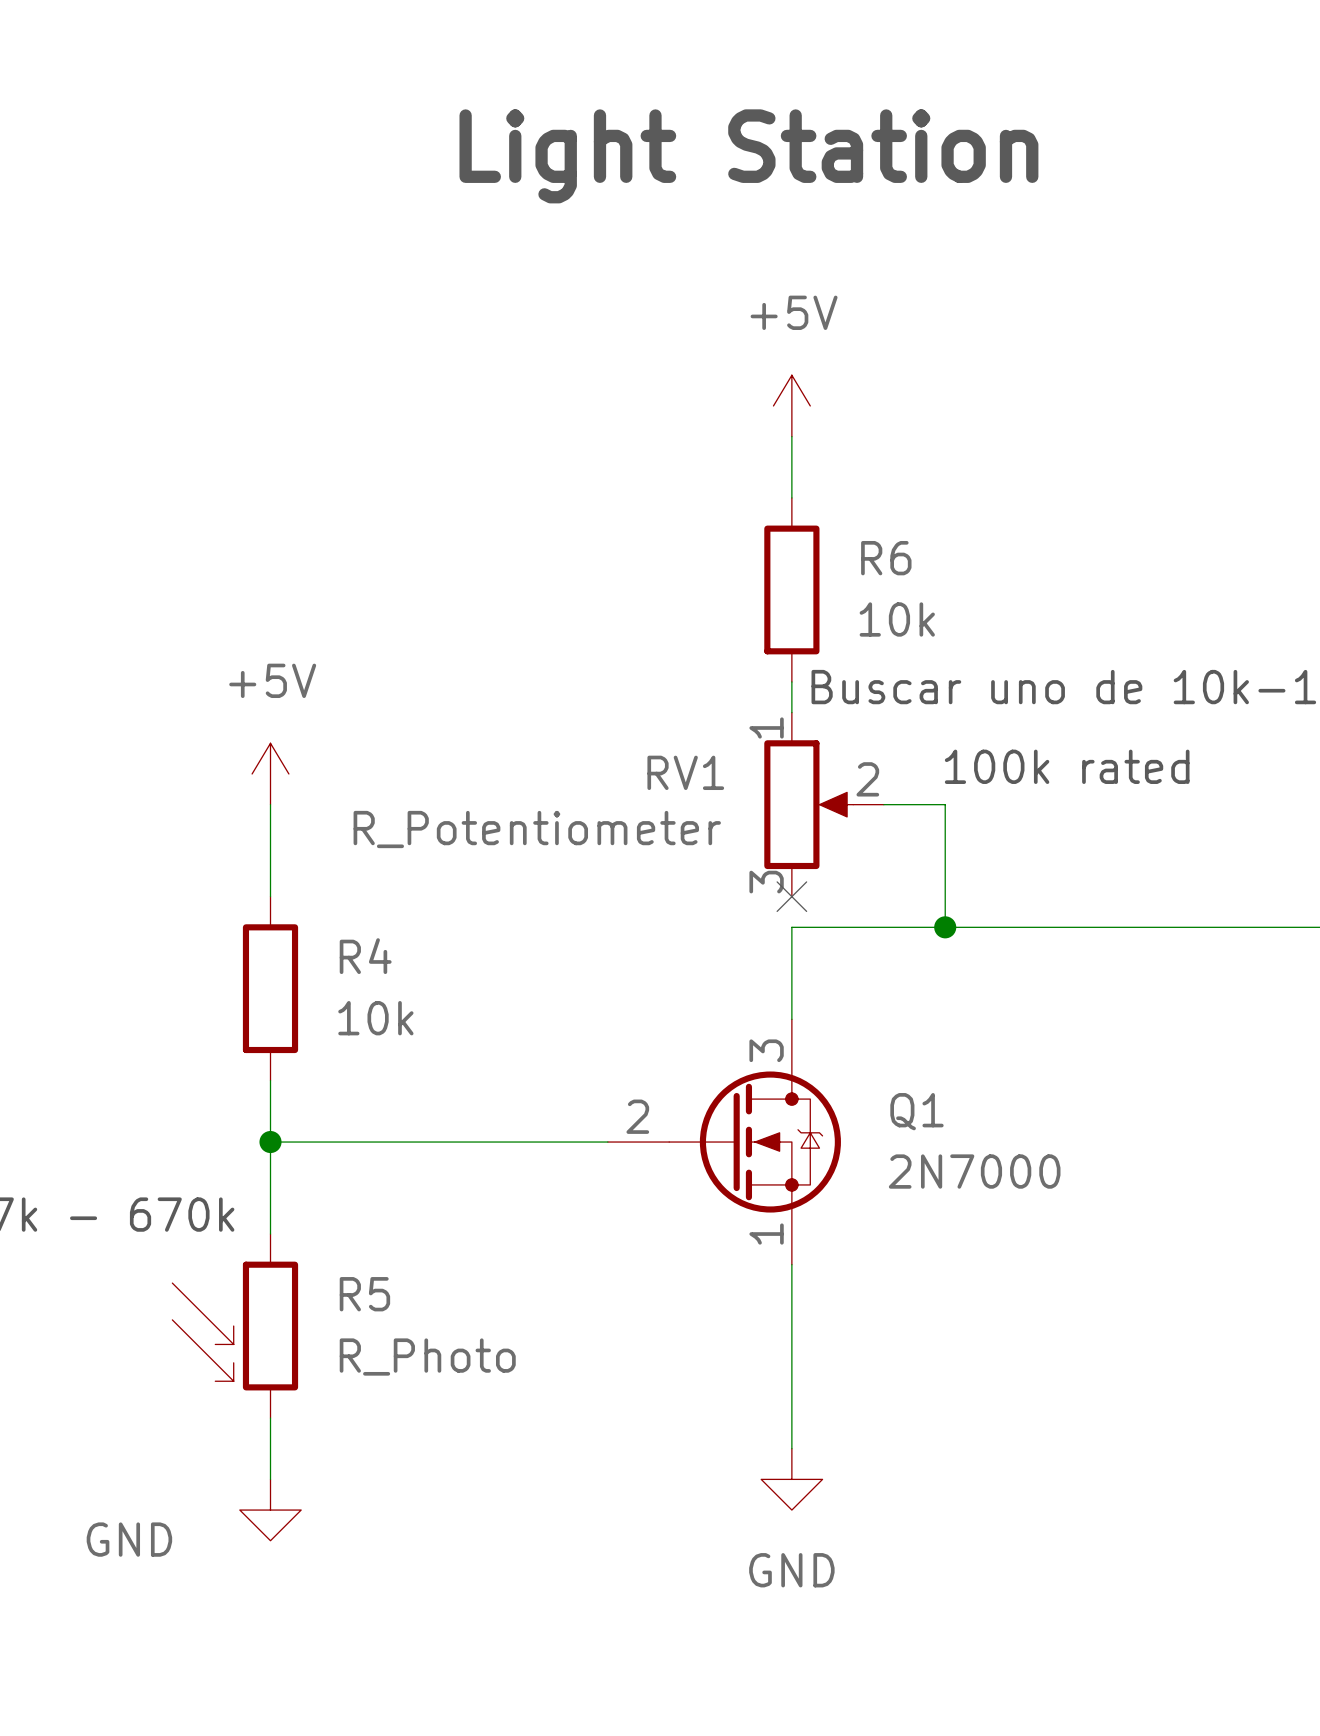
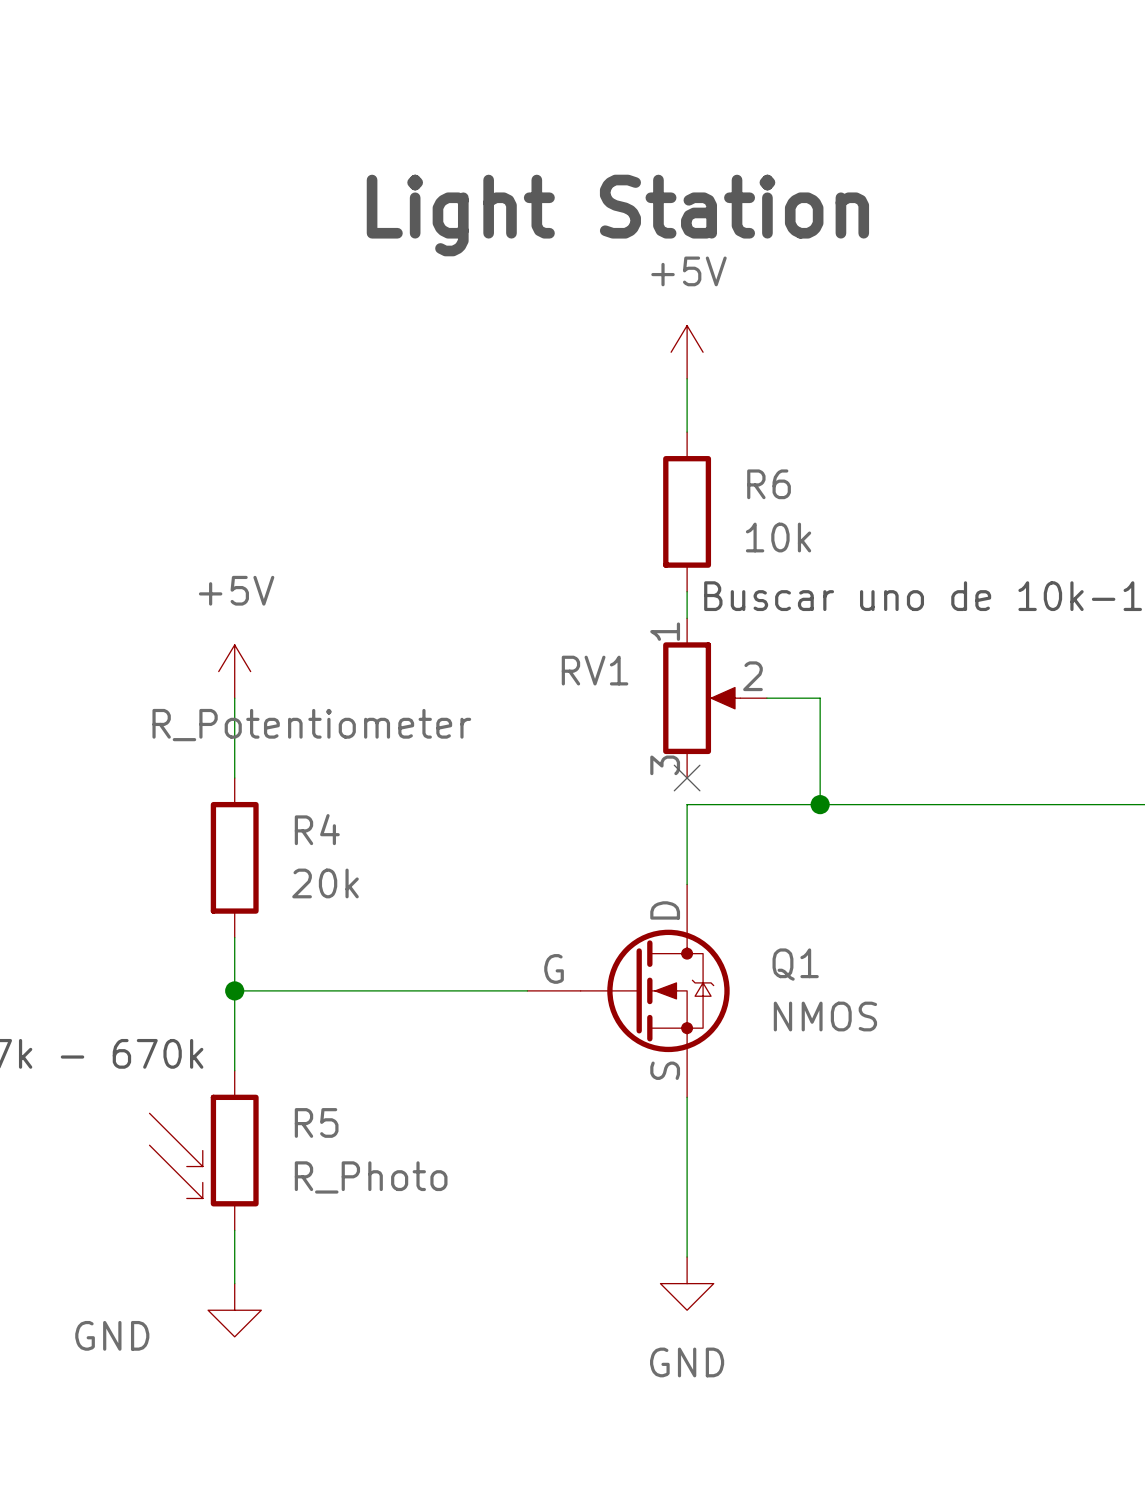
text position: Light Station (748, 156) -> Light Station (617, 215)
text: 100k rated (1067, 766) -> none
RV1 value position: R_Potentiometer (537, 829) -> R_Potentiometer (311, 725)
R4 value: 10k (375, 1018) -> 20k (325, 883)
Q1 pin name: none -> D (665, 910)
Q1 pin number: 3 (766, 1050) -> none
Q1 pin number: 2 (637, 1116) -> none
Q1 pin name: none -> G (554, 968)
Q1 value: 2N7000 (974, 1171) -> NMOS (825, 1016)
Q1 pin name: none -> S (665, 1070)
Q1 pin number: 1 (766, 1234) -> none

